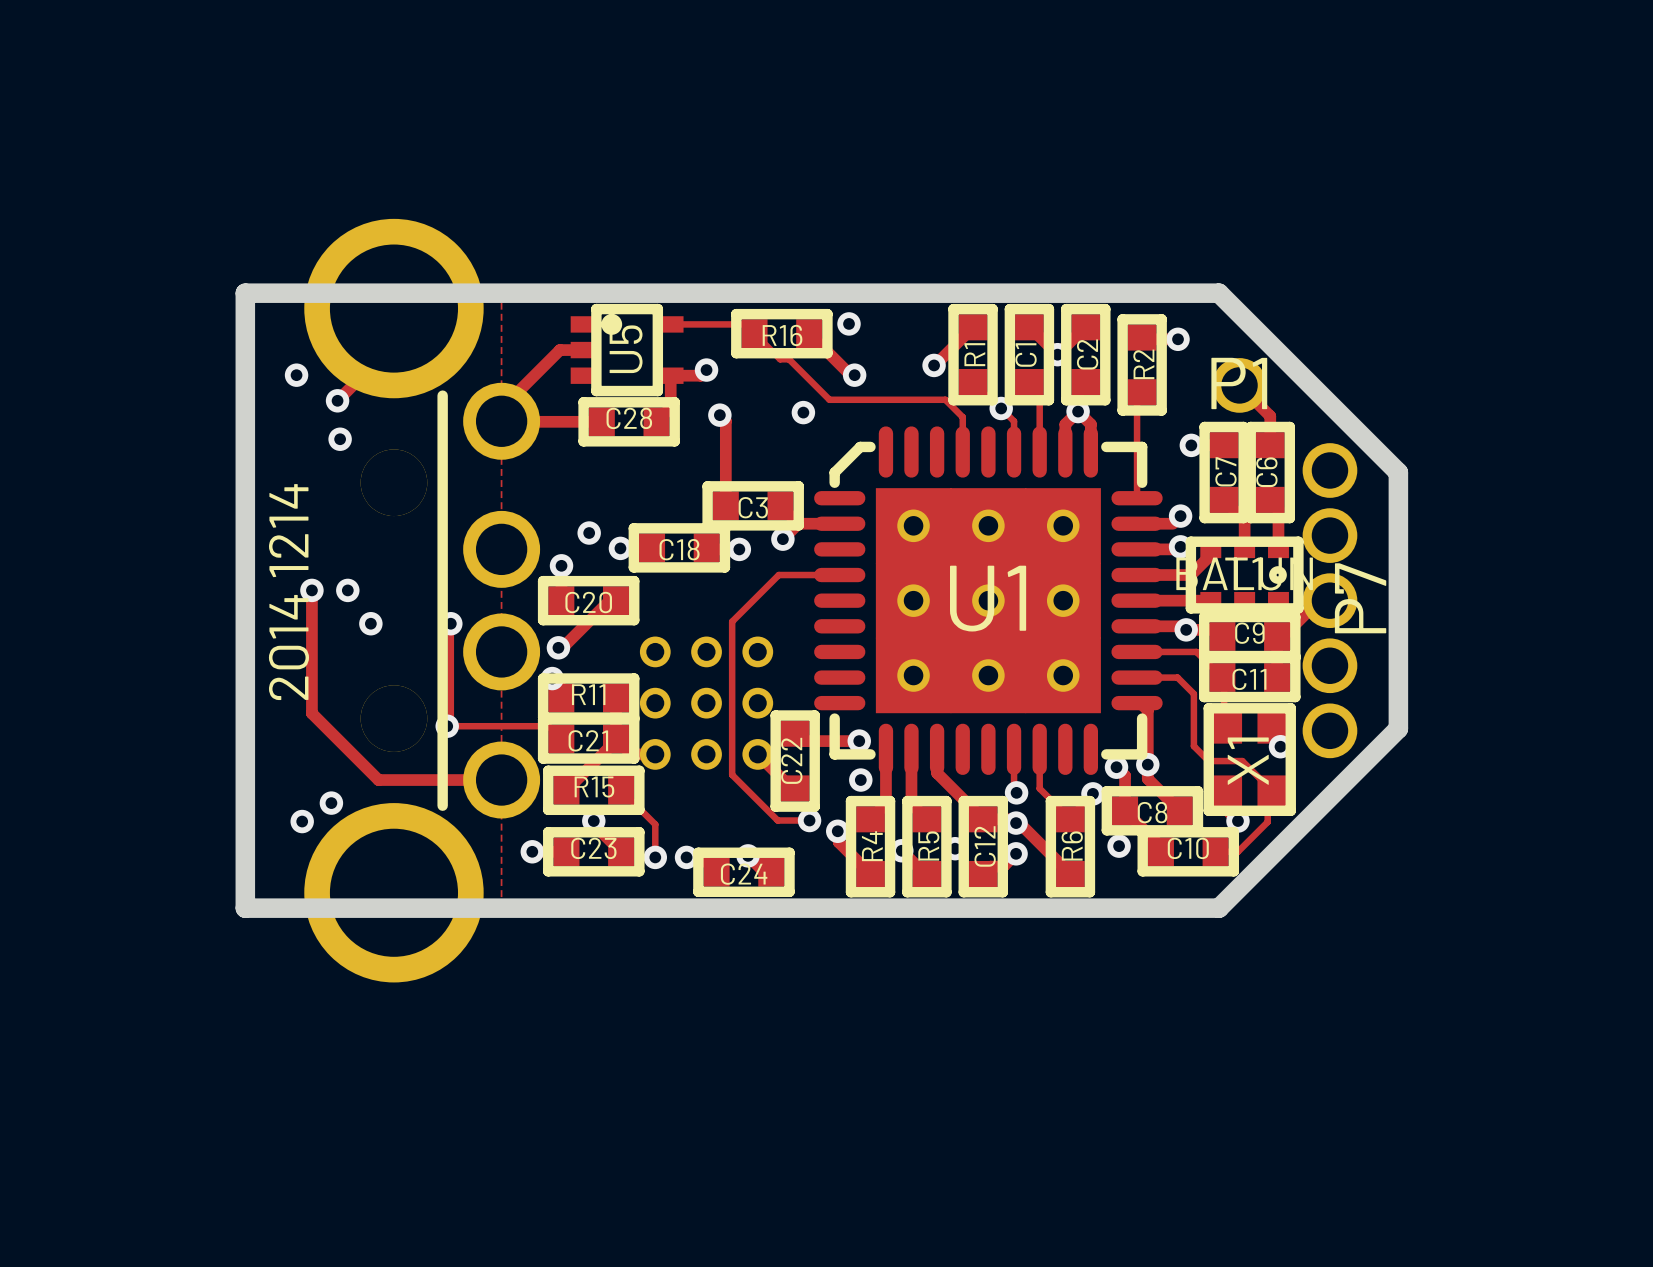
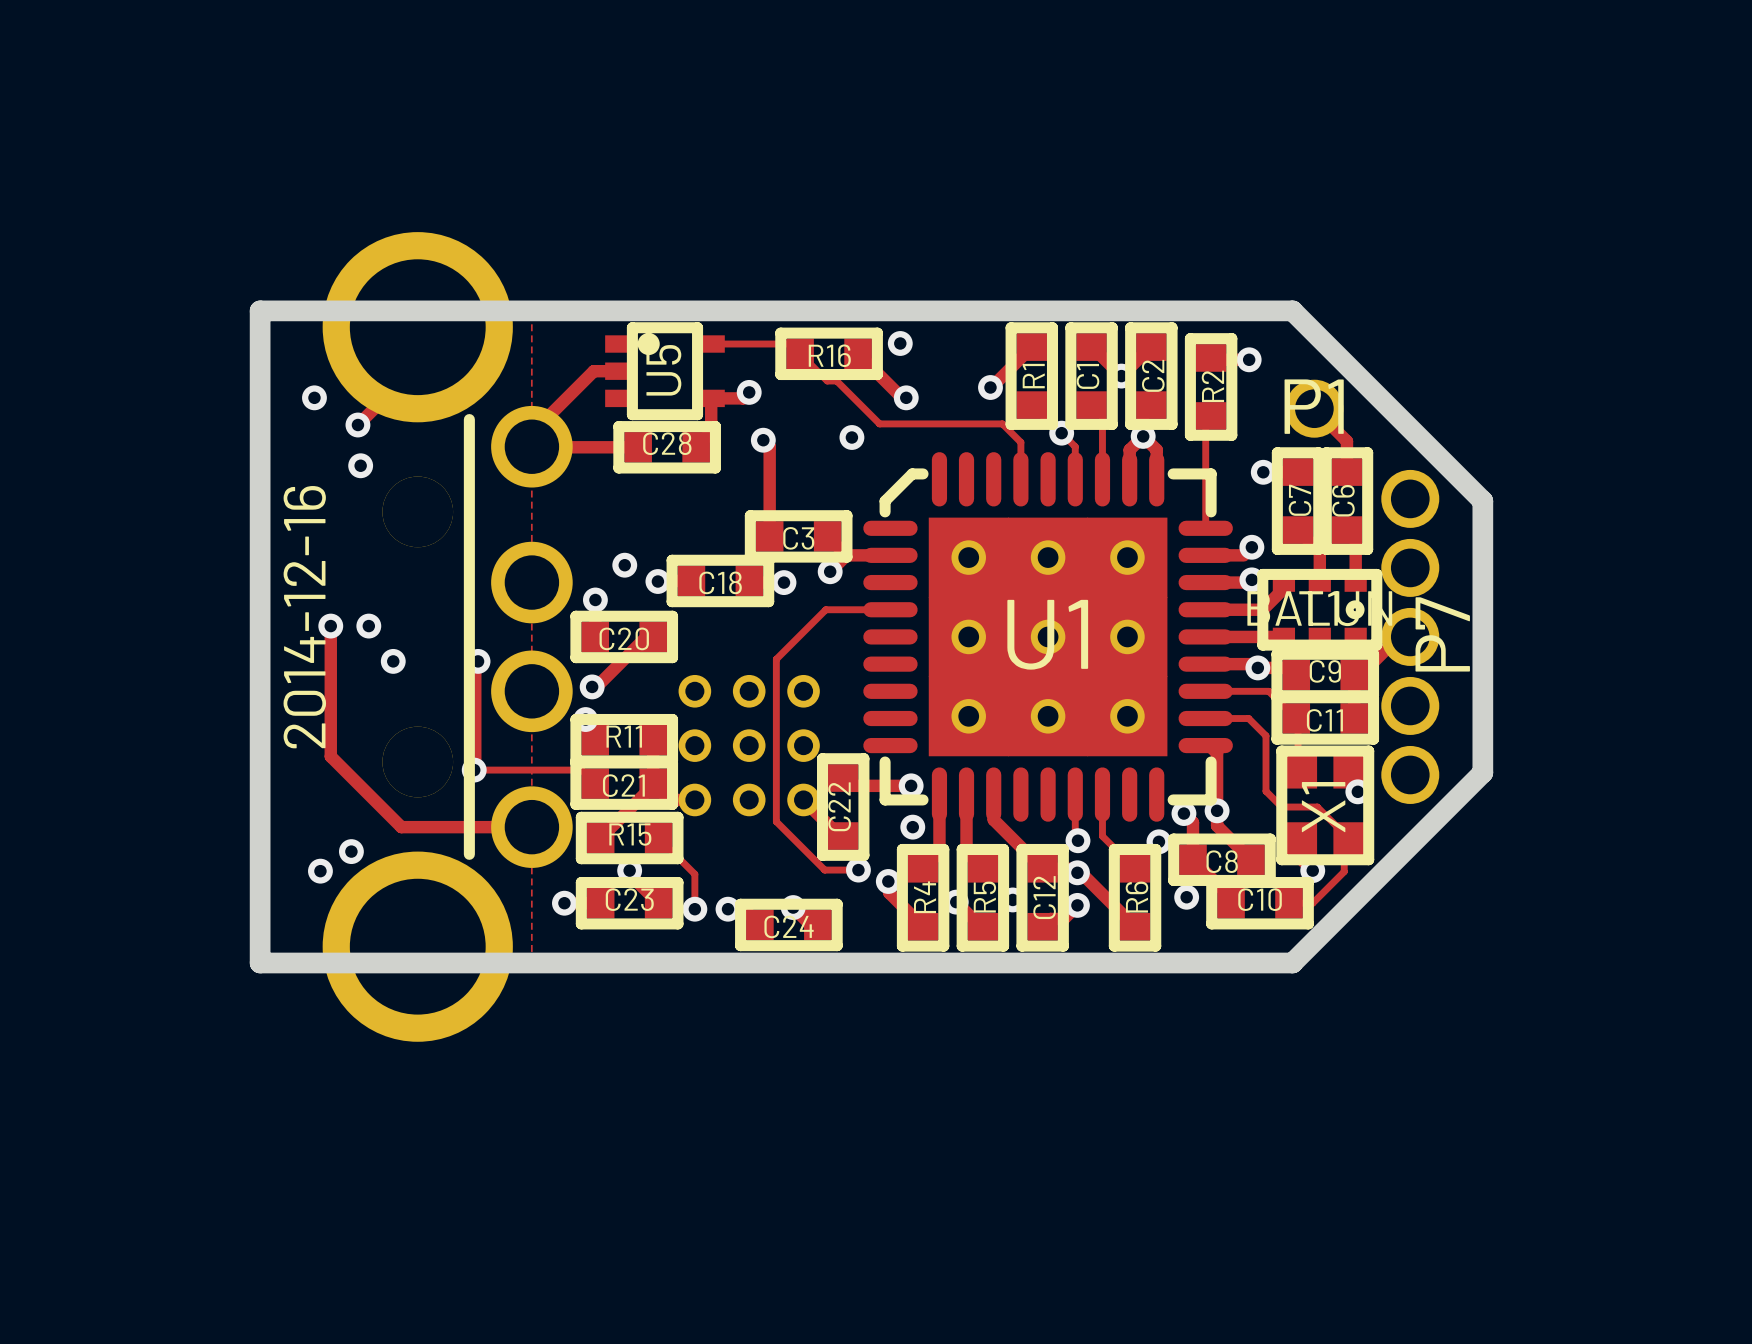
text: 2014 1214 (288, 592) -> 2014-12-16 (304, 617)

